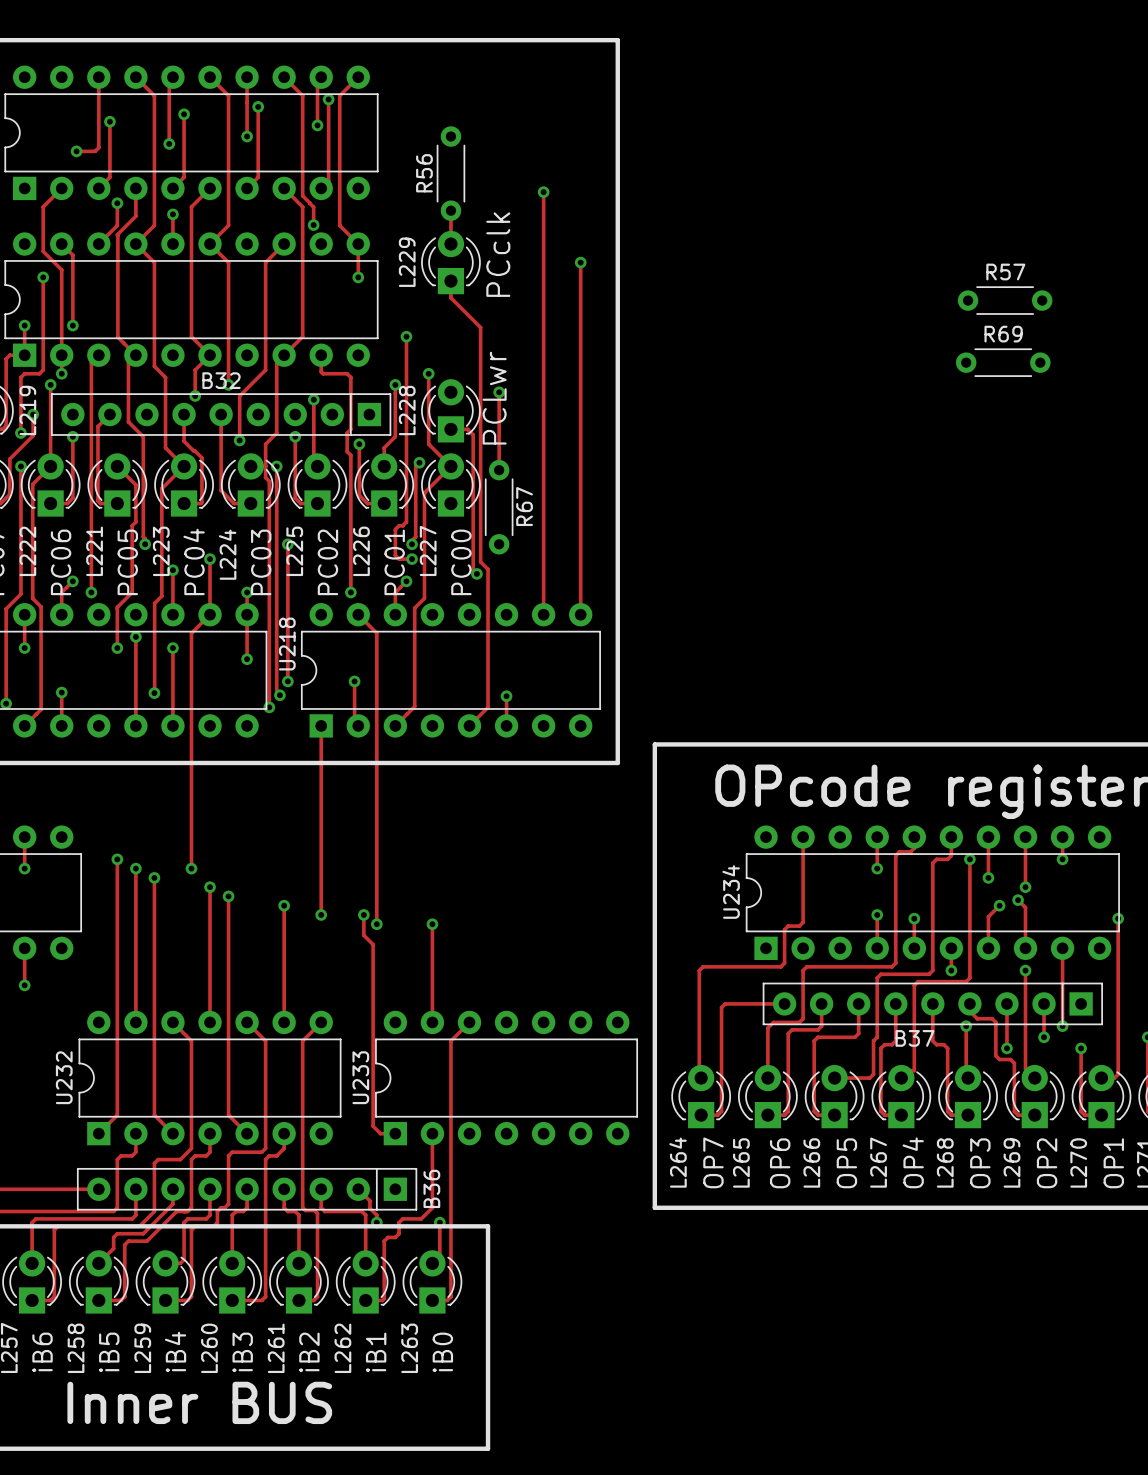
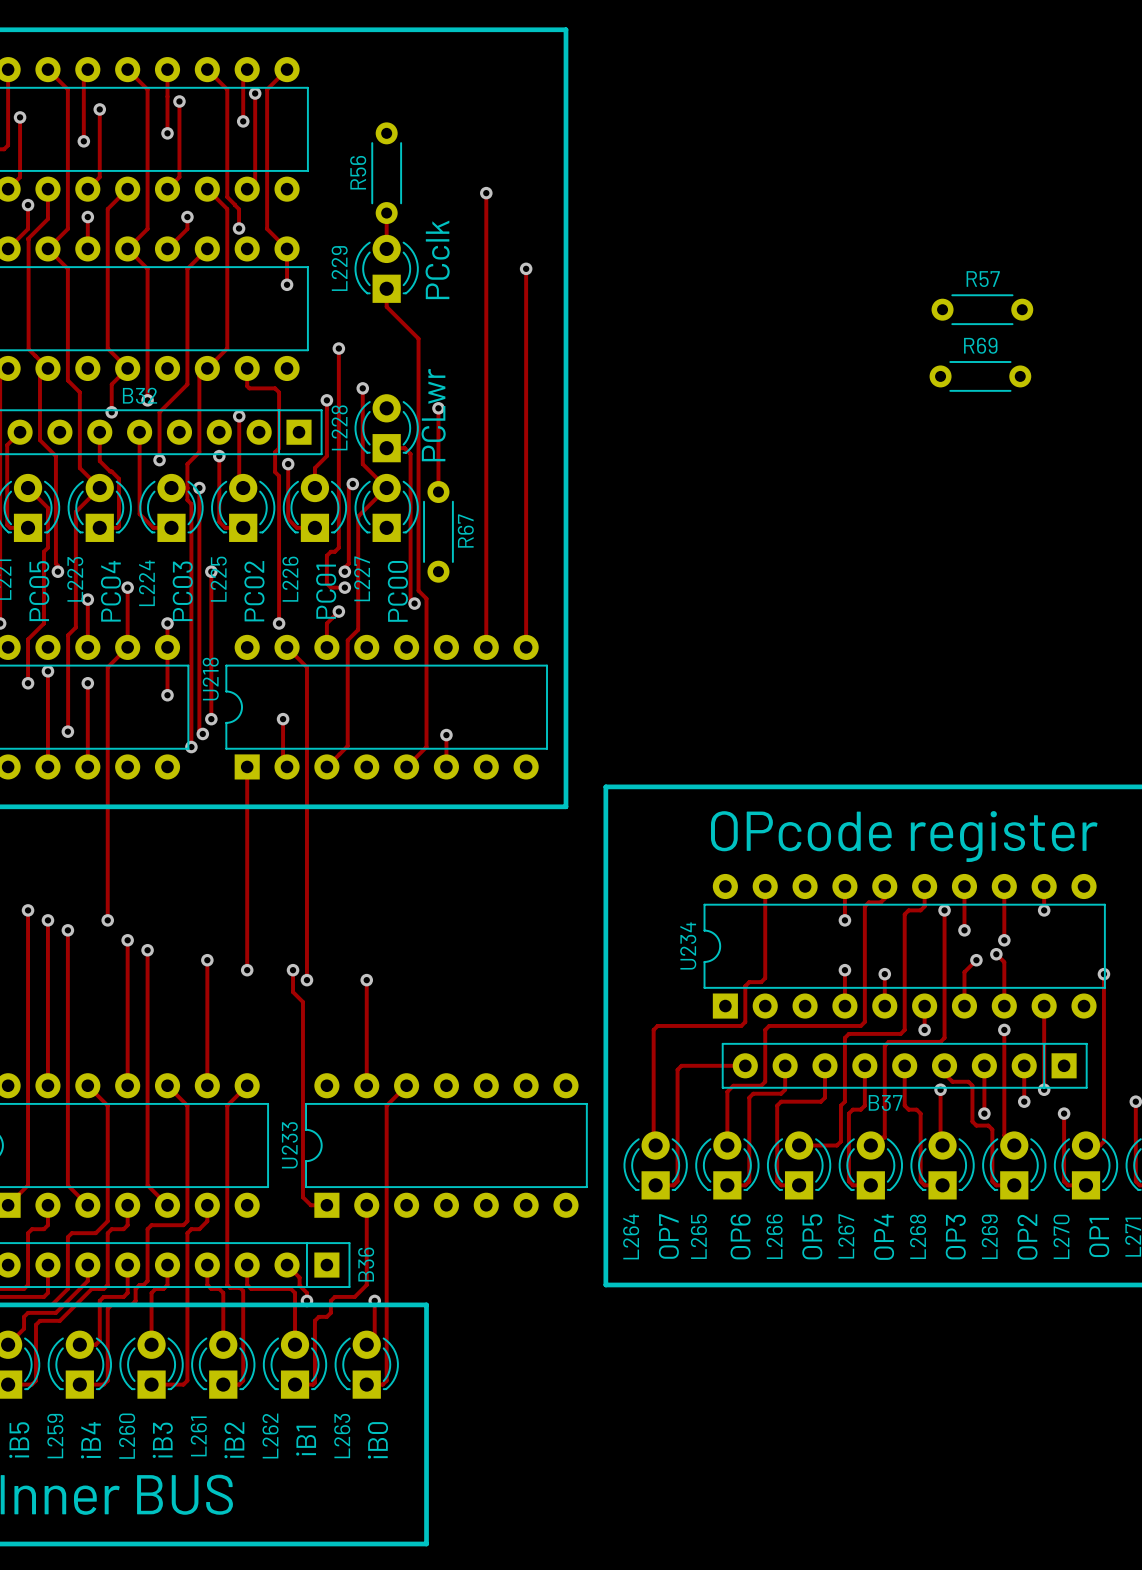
track: none -> (187, 217) (187, 229) (167, 248)
via: none -> (187, 217)

